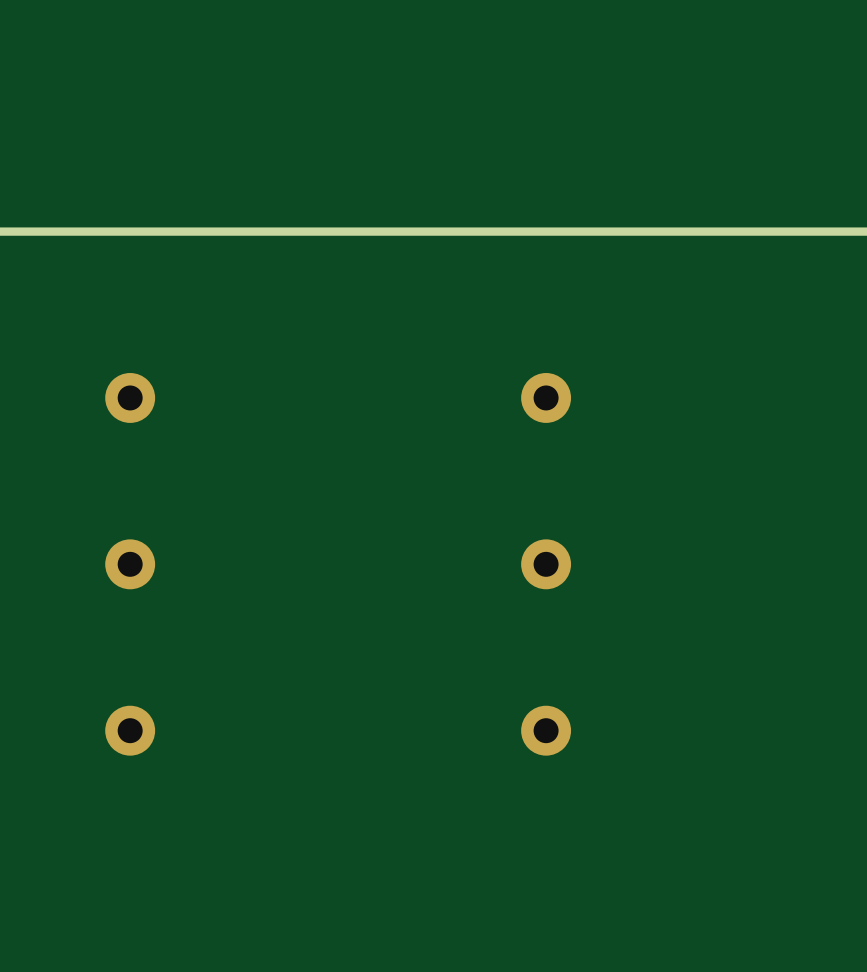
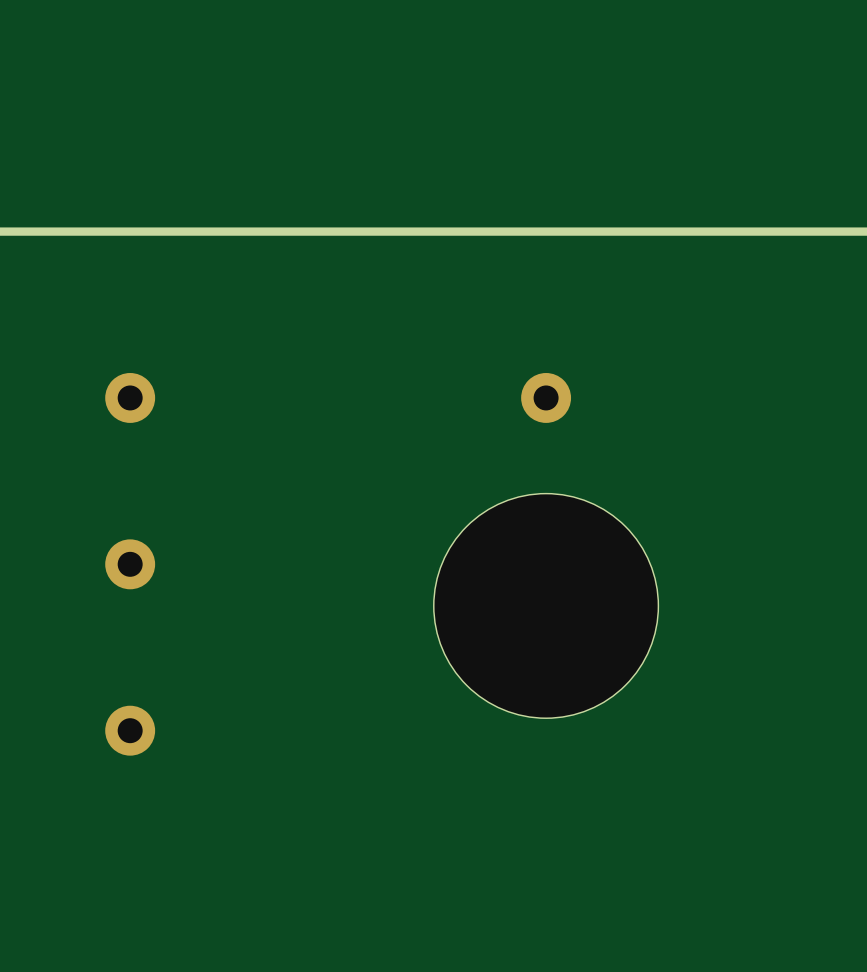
via: (546, 564) -> none
part: none -> (546, 605)
via: (546, 730) -> none

